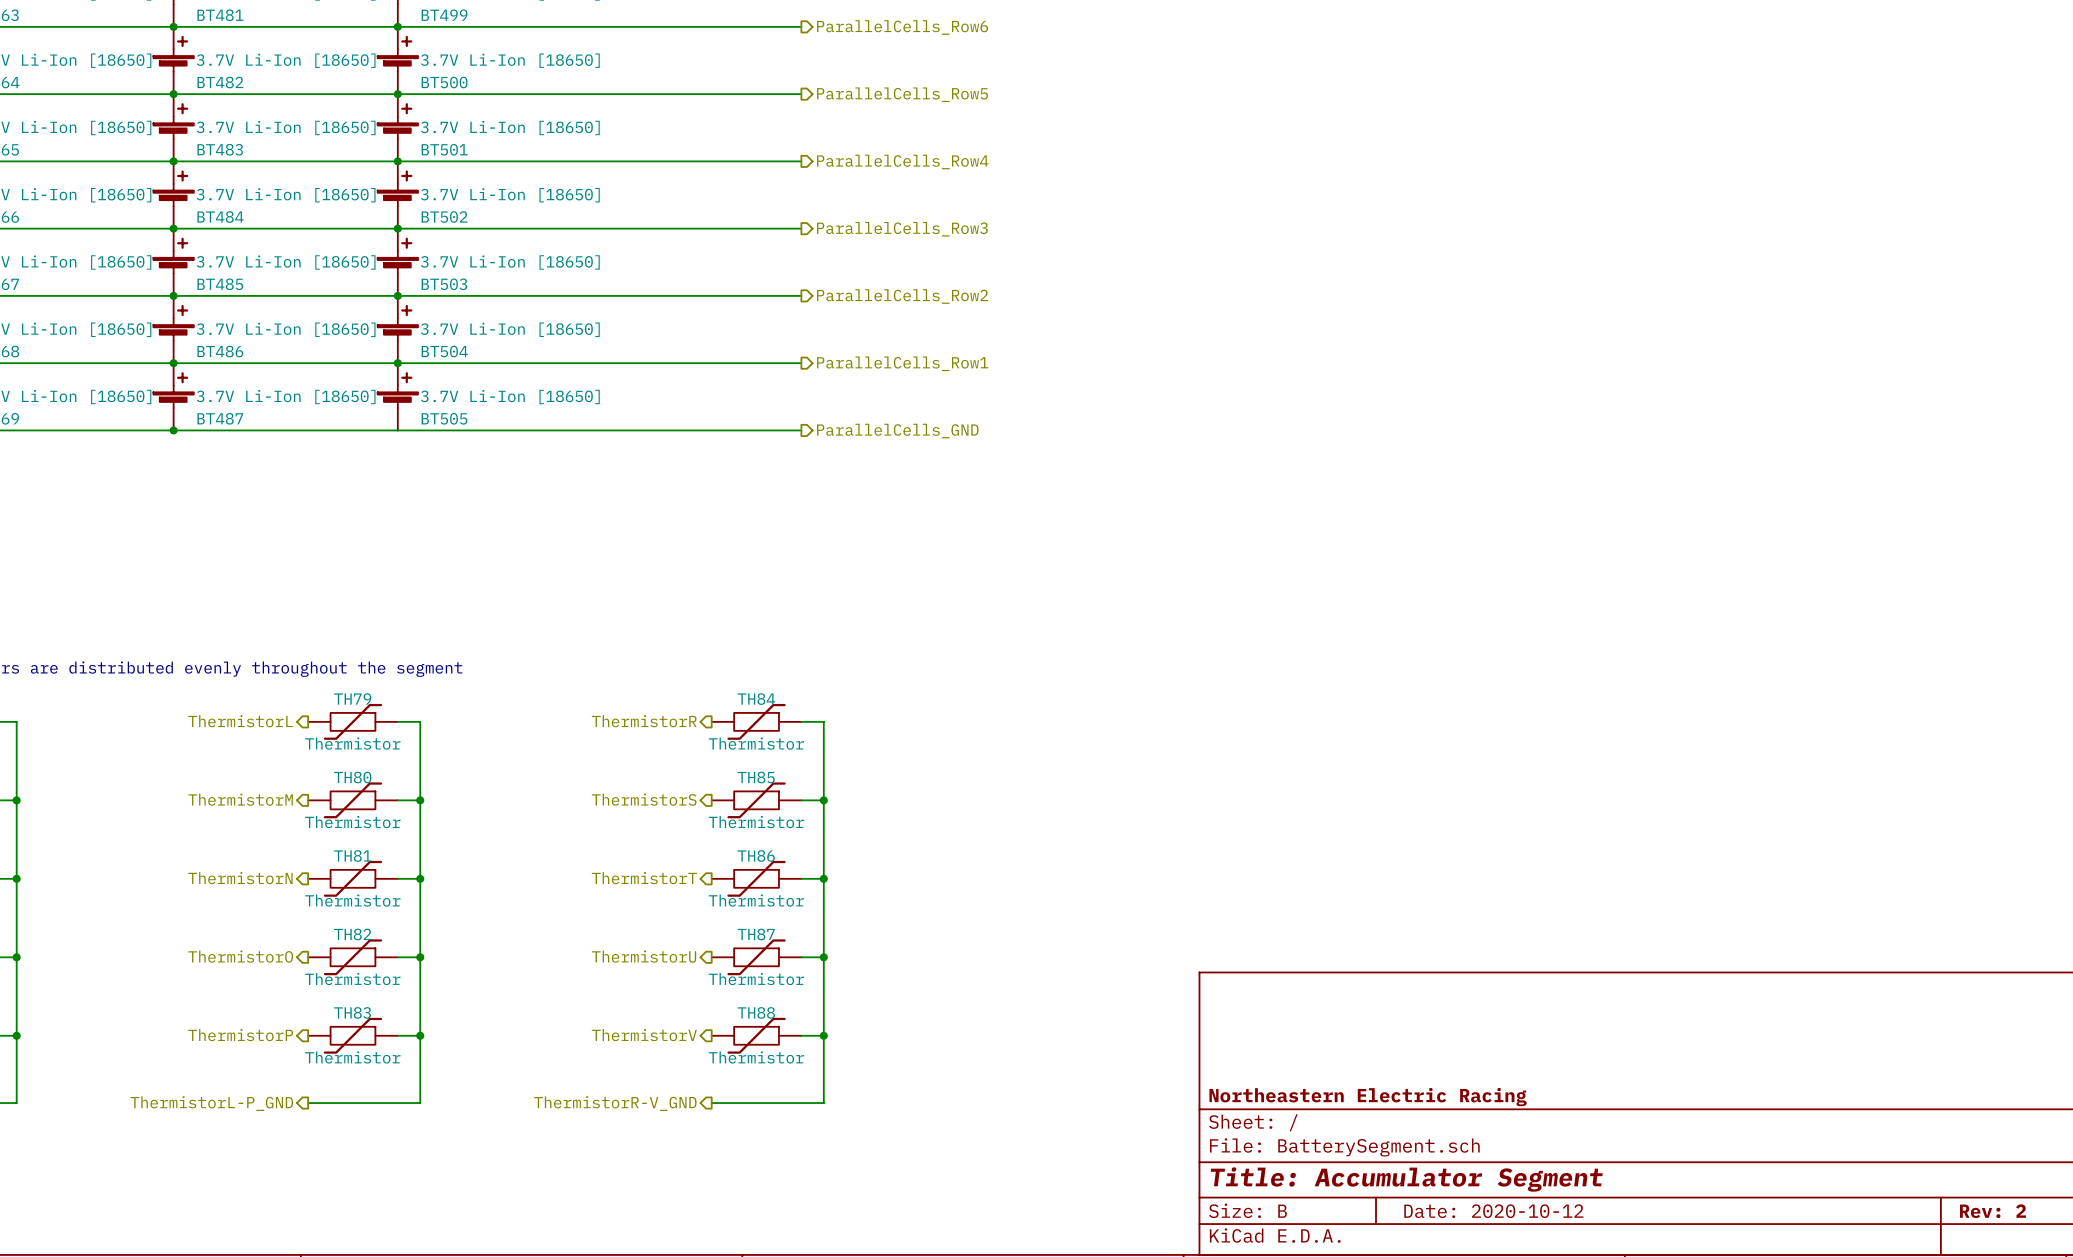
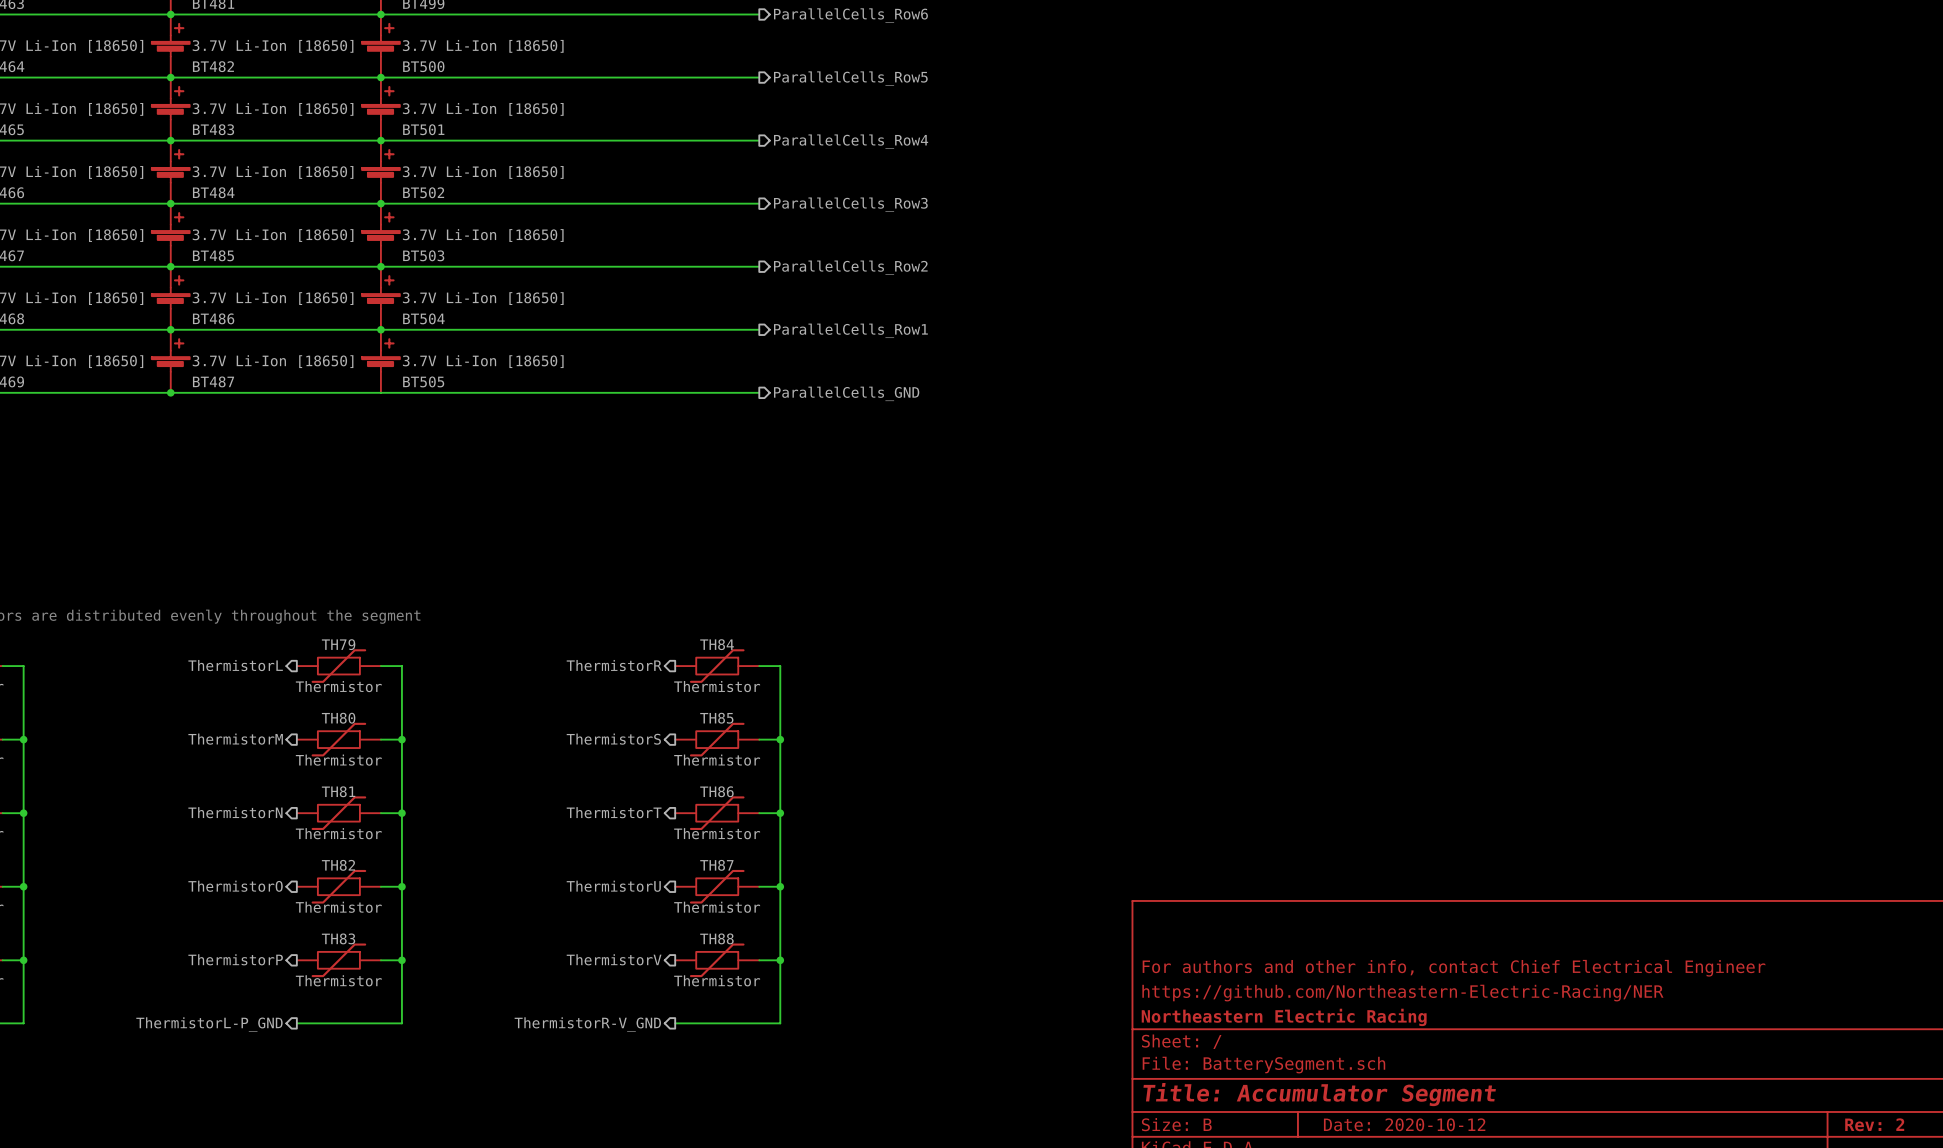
title block: none -> For authors and other info, contact Chief Electrical Engineer (1454, 968)
title block: none -> https://github.com/Northeastern-Electric-Racing/NER (1402, 993)

